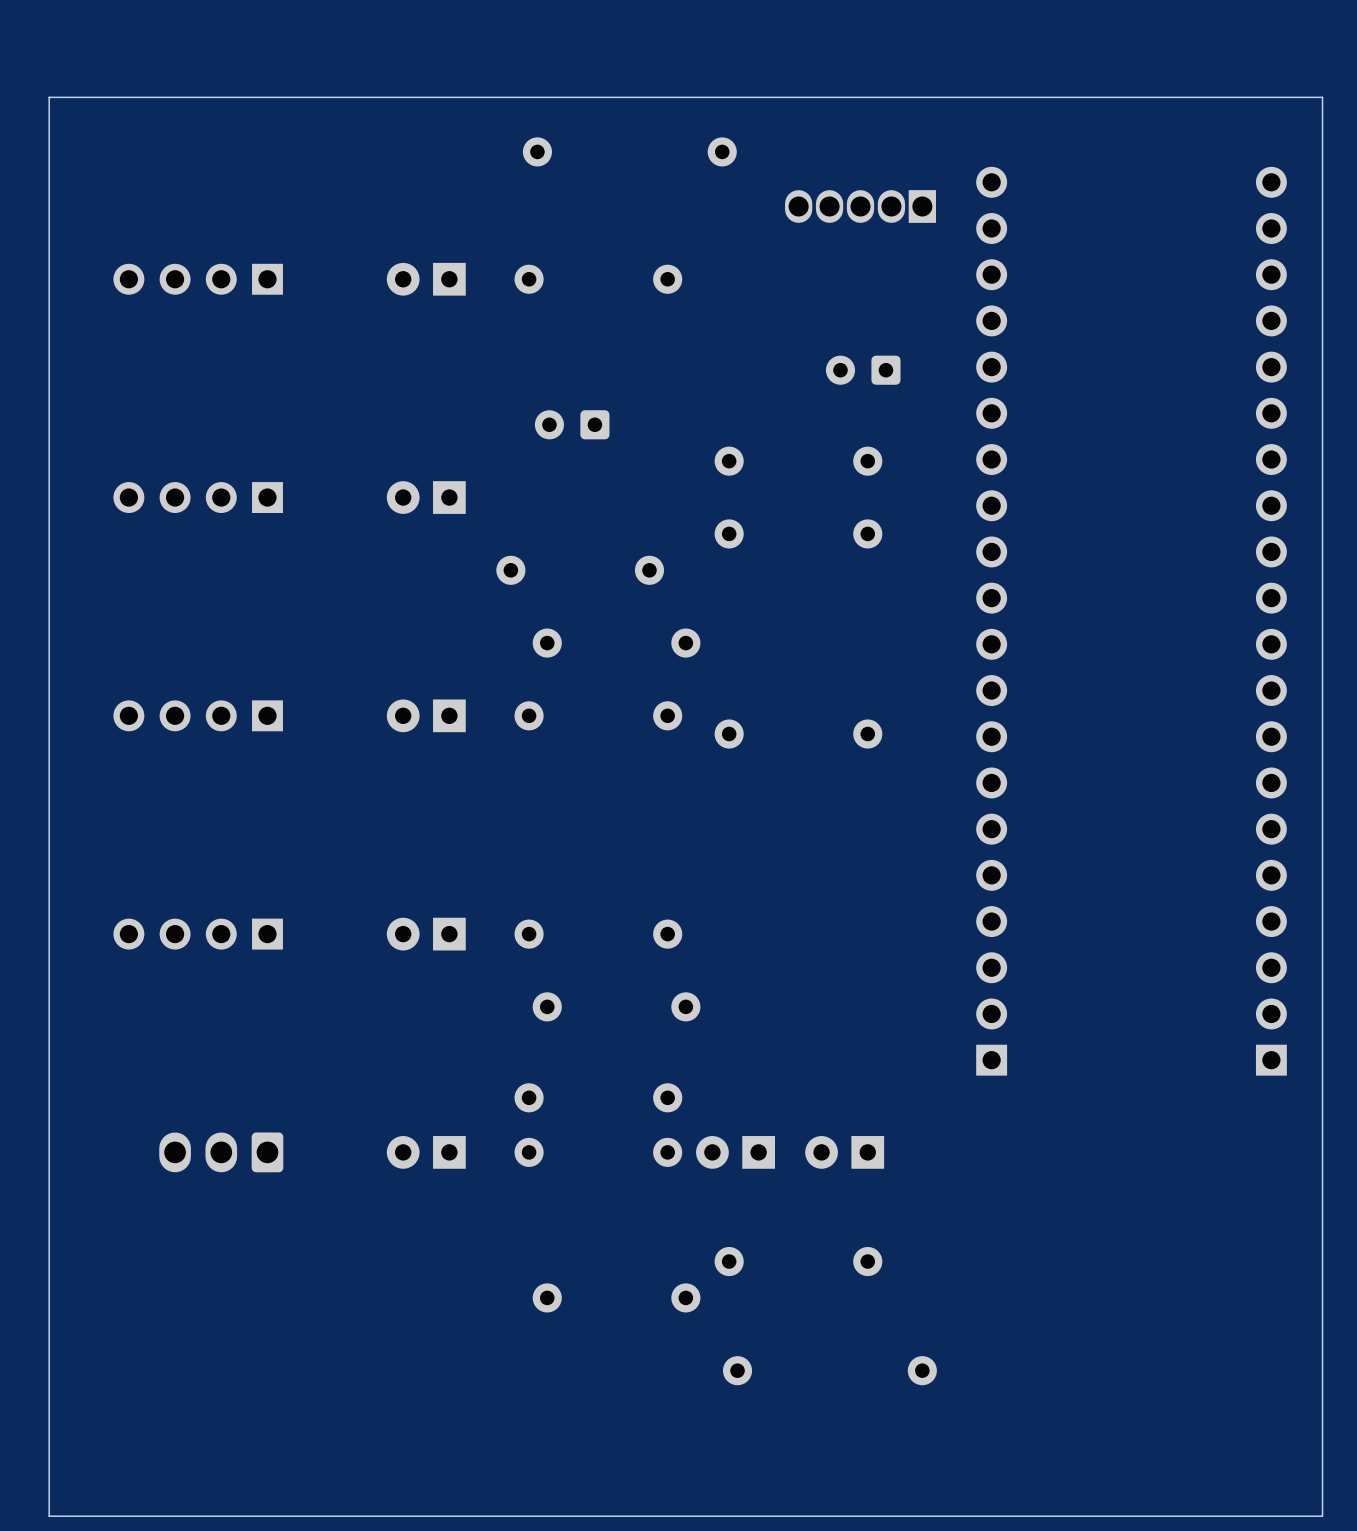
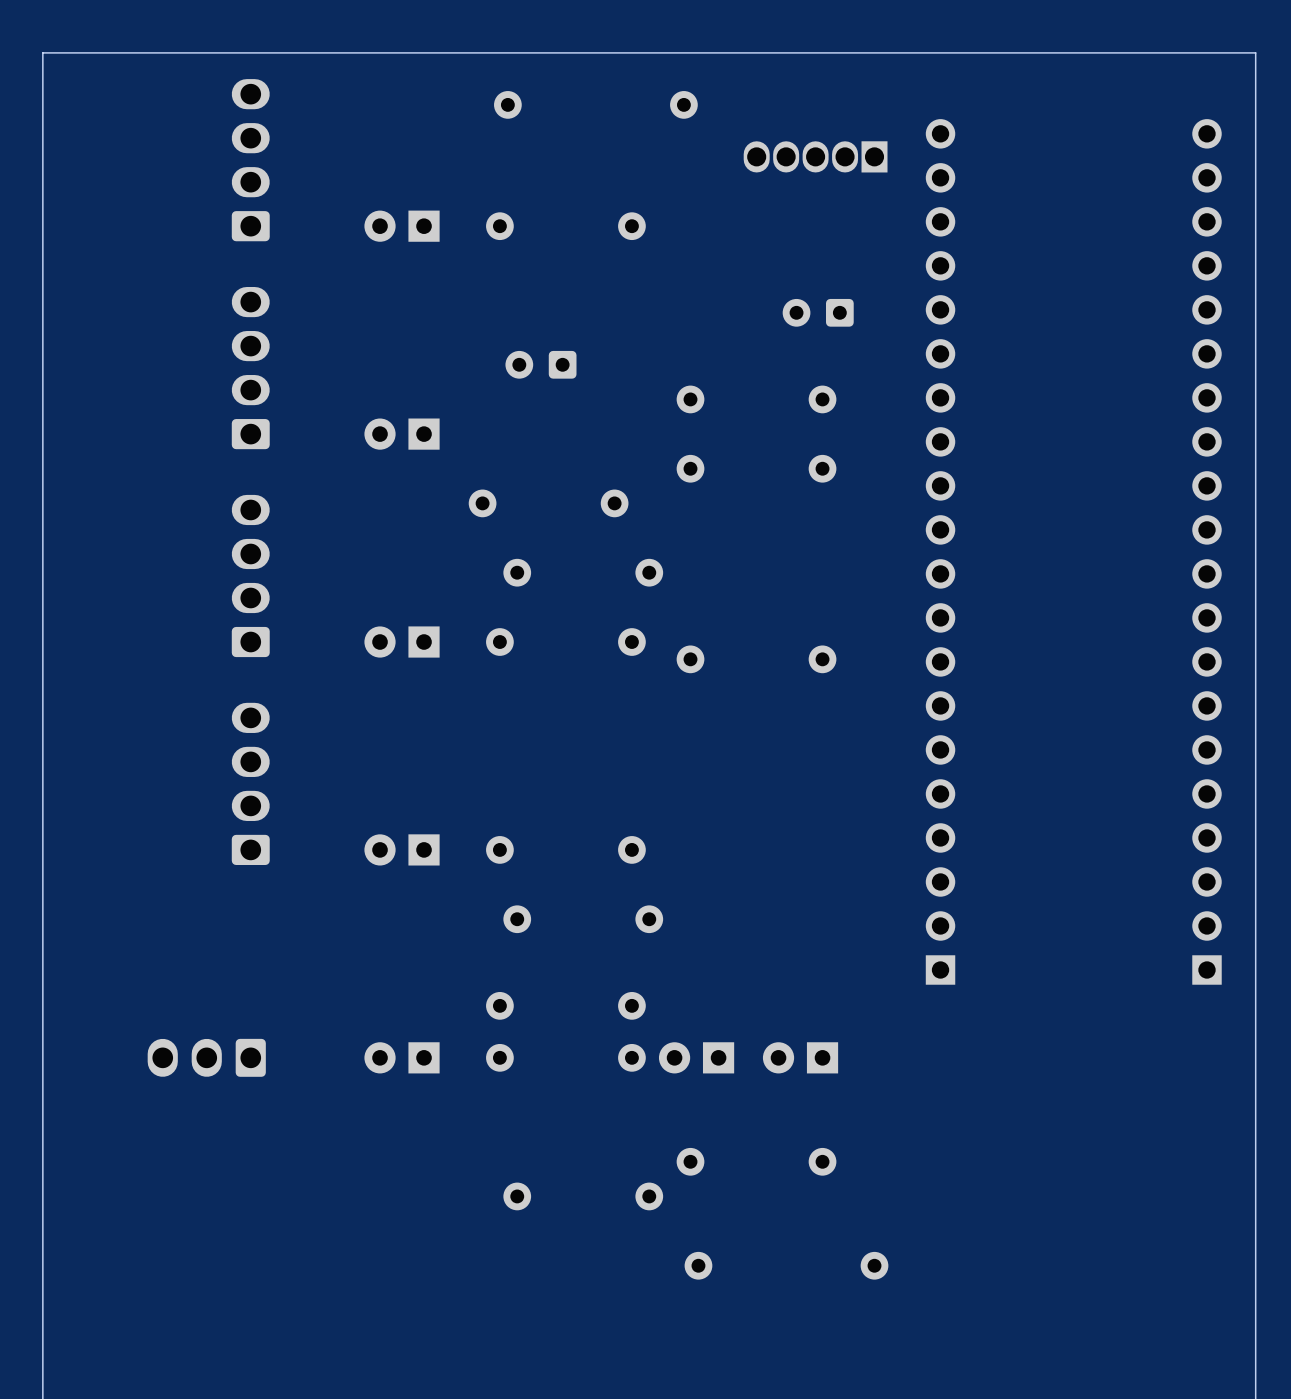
part: none -> (250, 160)
part: (198, 279) -> none
part: none -> (250, 368)
part: (198, 497) -> none
part: none -> (250, 576)
part: (198, 715) -> none
part: none -> (250, 783)
part: (198, 934) -> none

